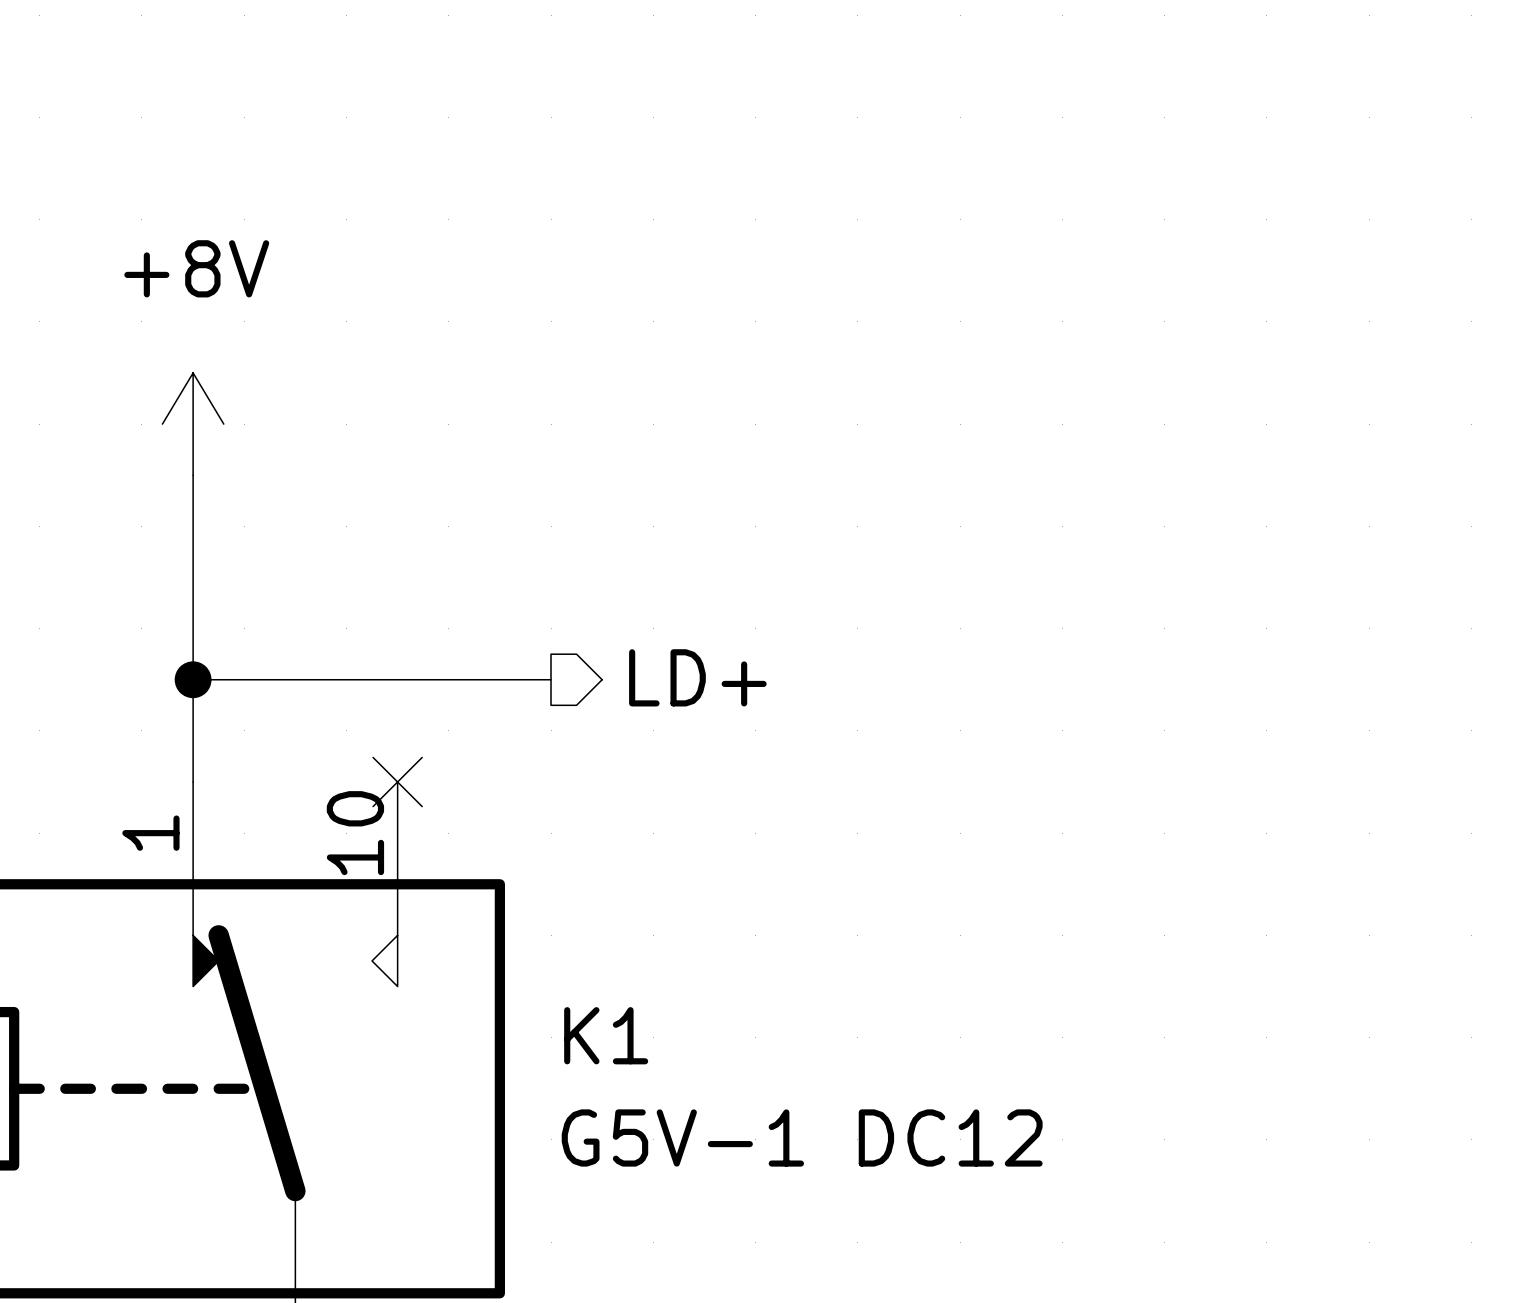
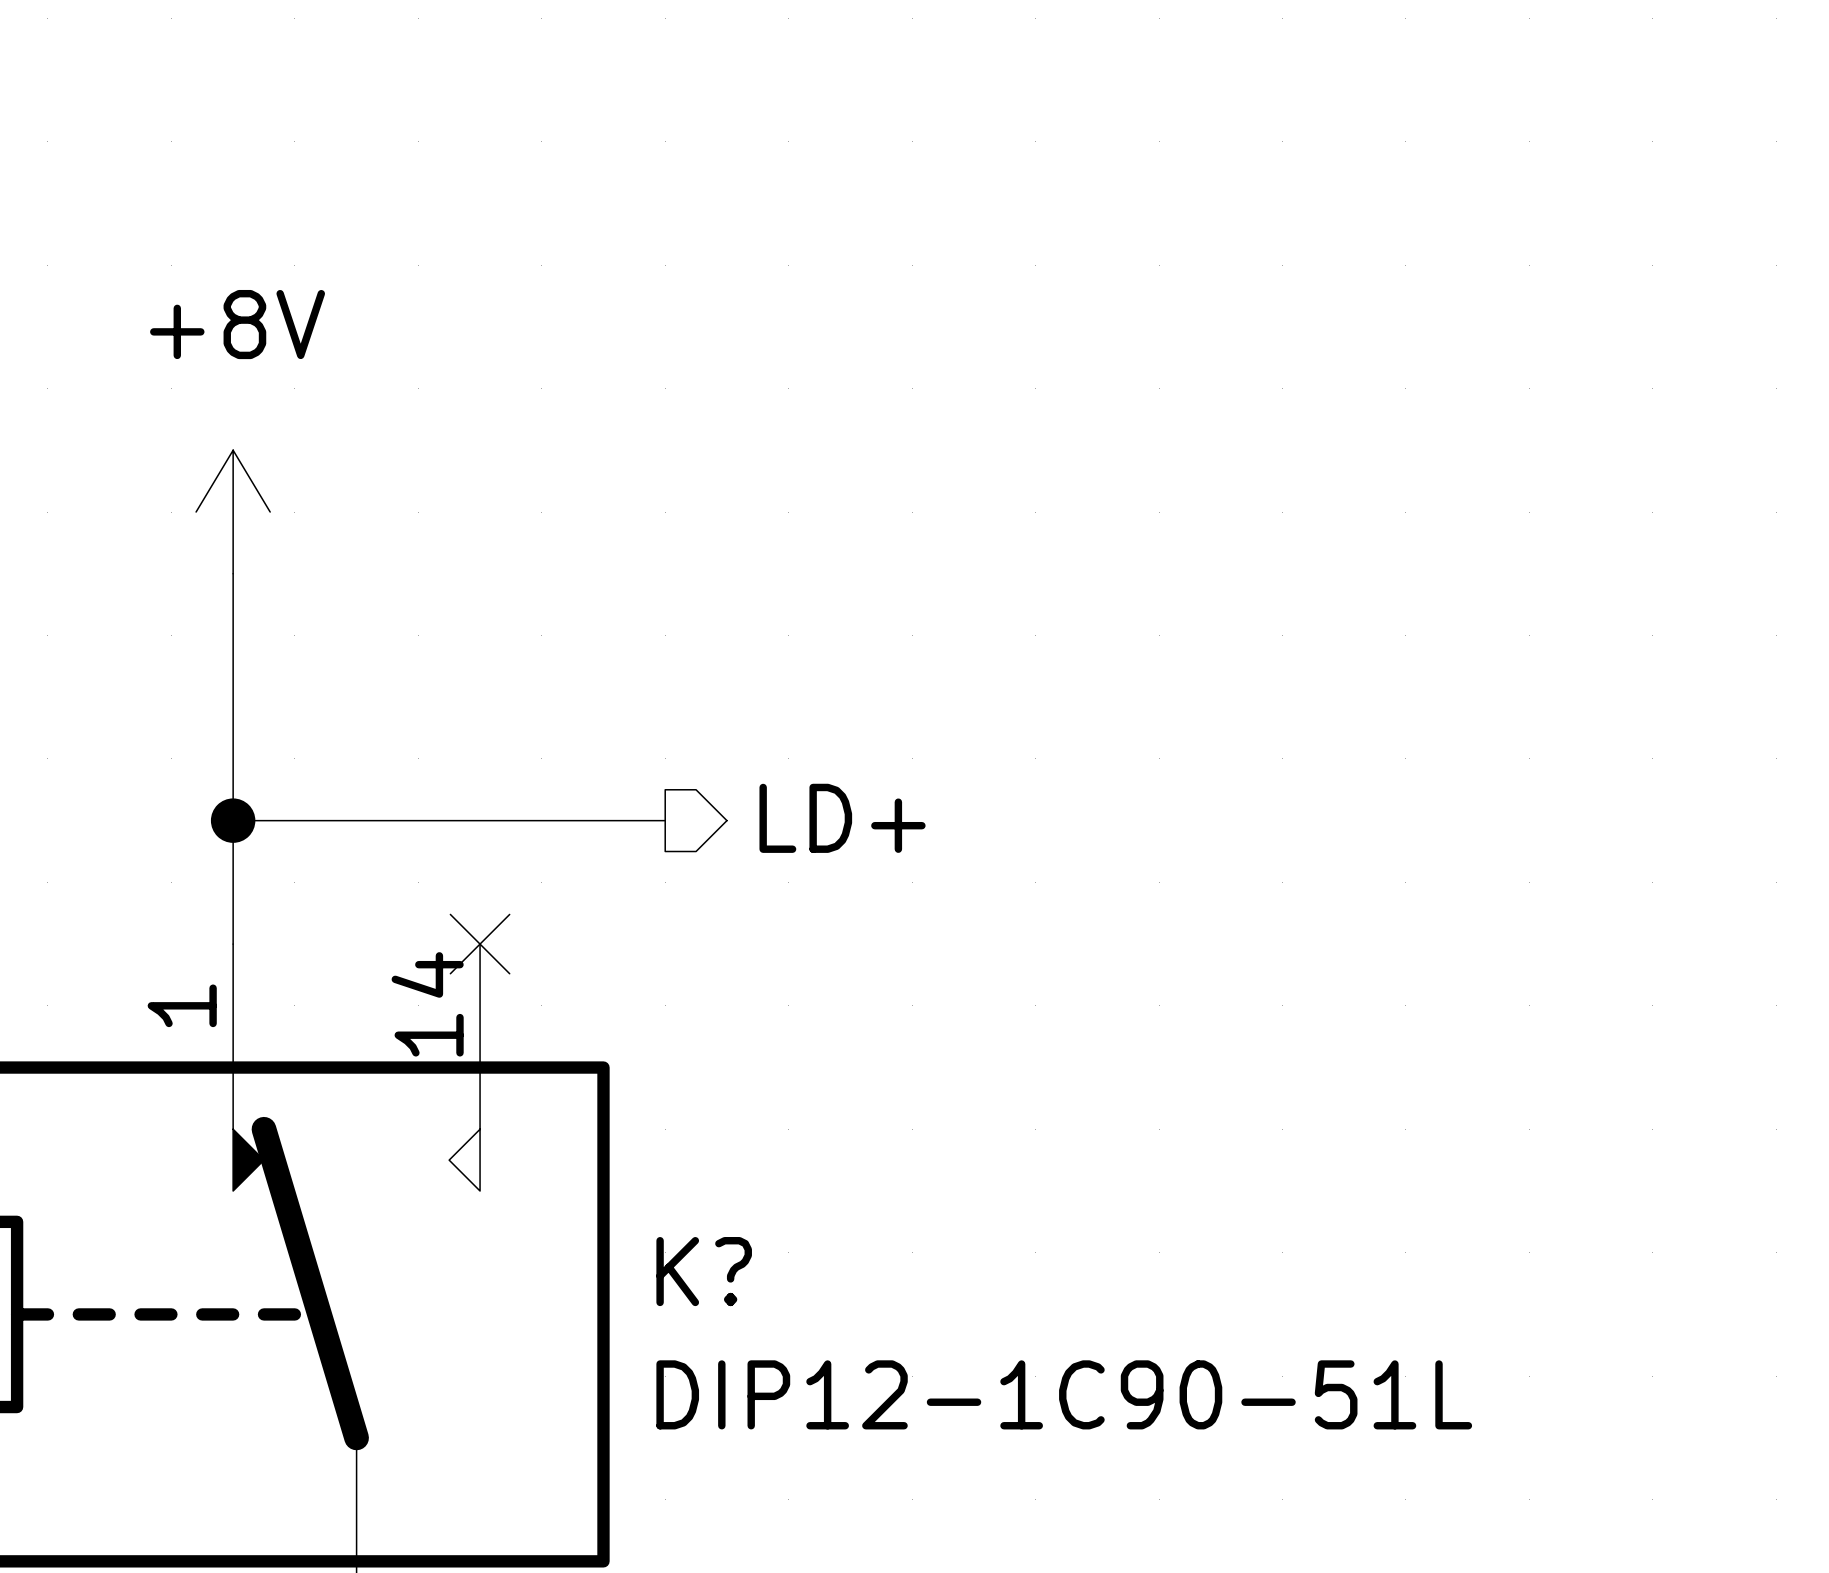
K1 pin number: 10 (355, 833) -> 14 (427, 1004)
K1 name: K1 (606, 1035) -> K? (704, 1271)
K1 value: G5V-1 DC12 (802, 1137) -> DIP12-1C90-51L (1064, 1394)

